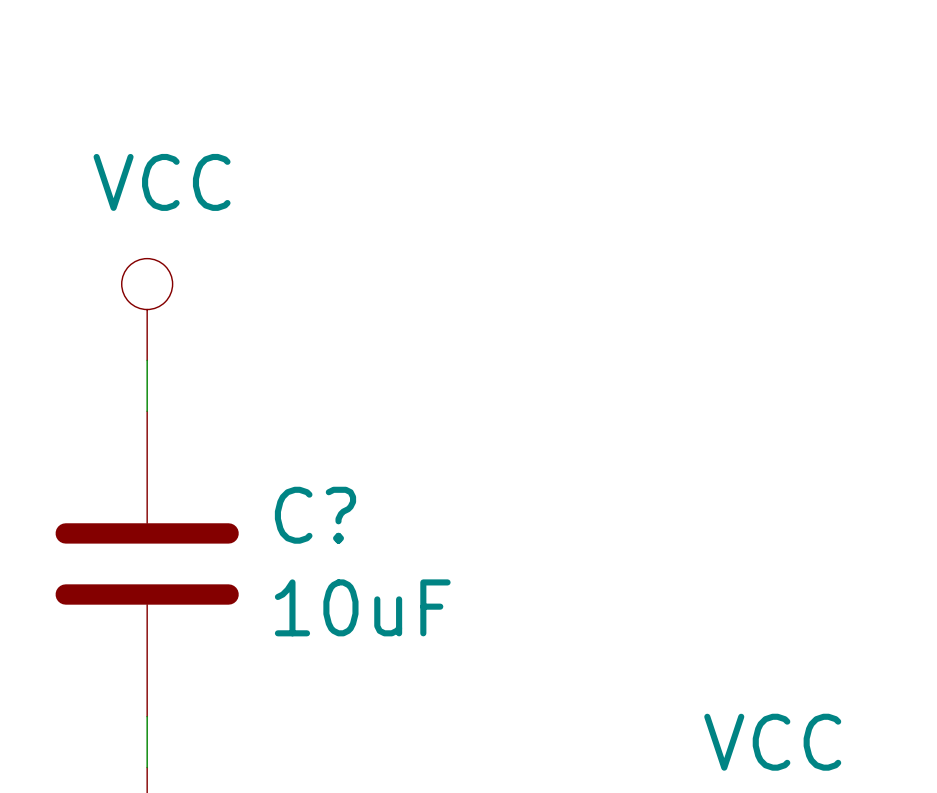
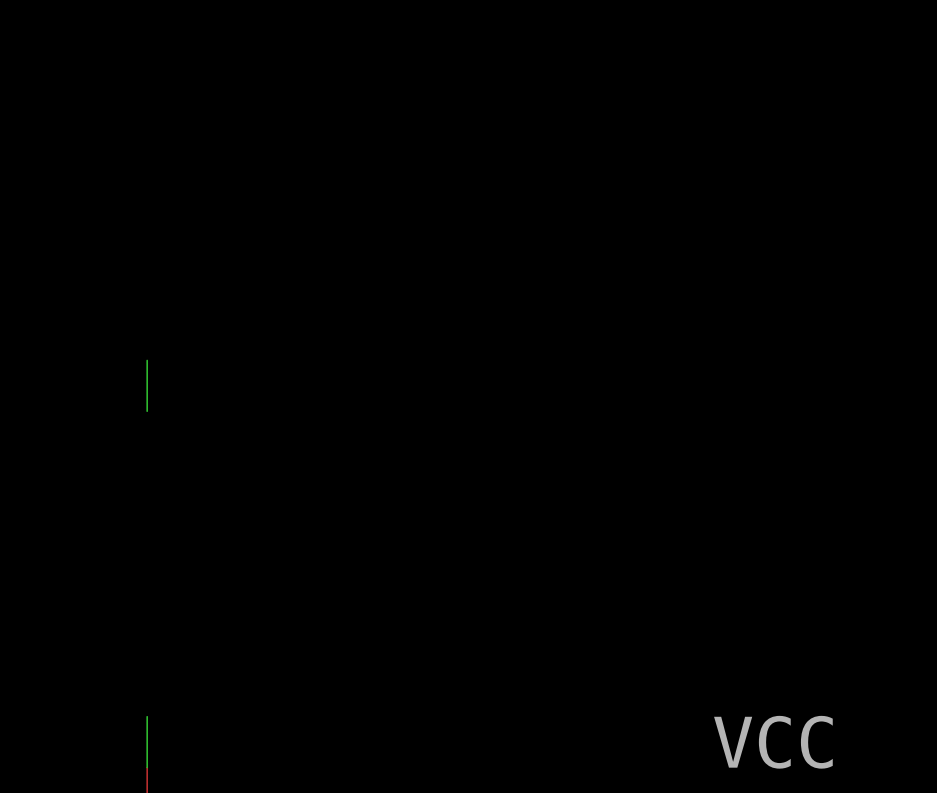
power symbol: VCC (147, 309) -> none
C?: 10uF (147, 563) -> none

